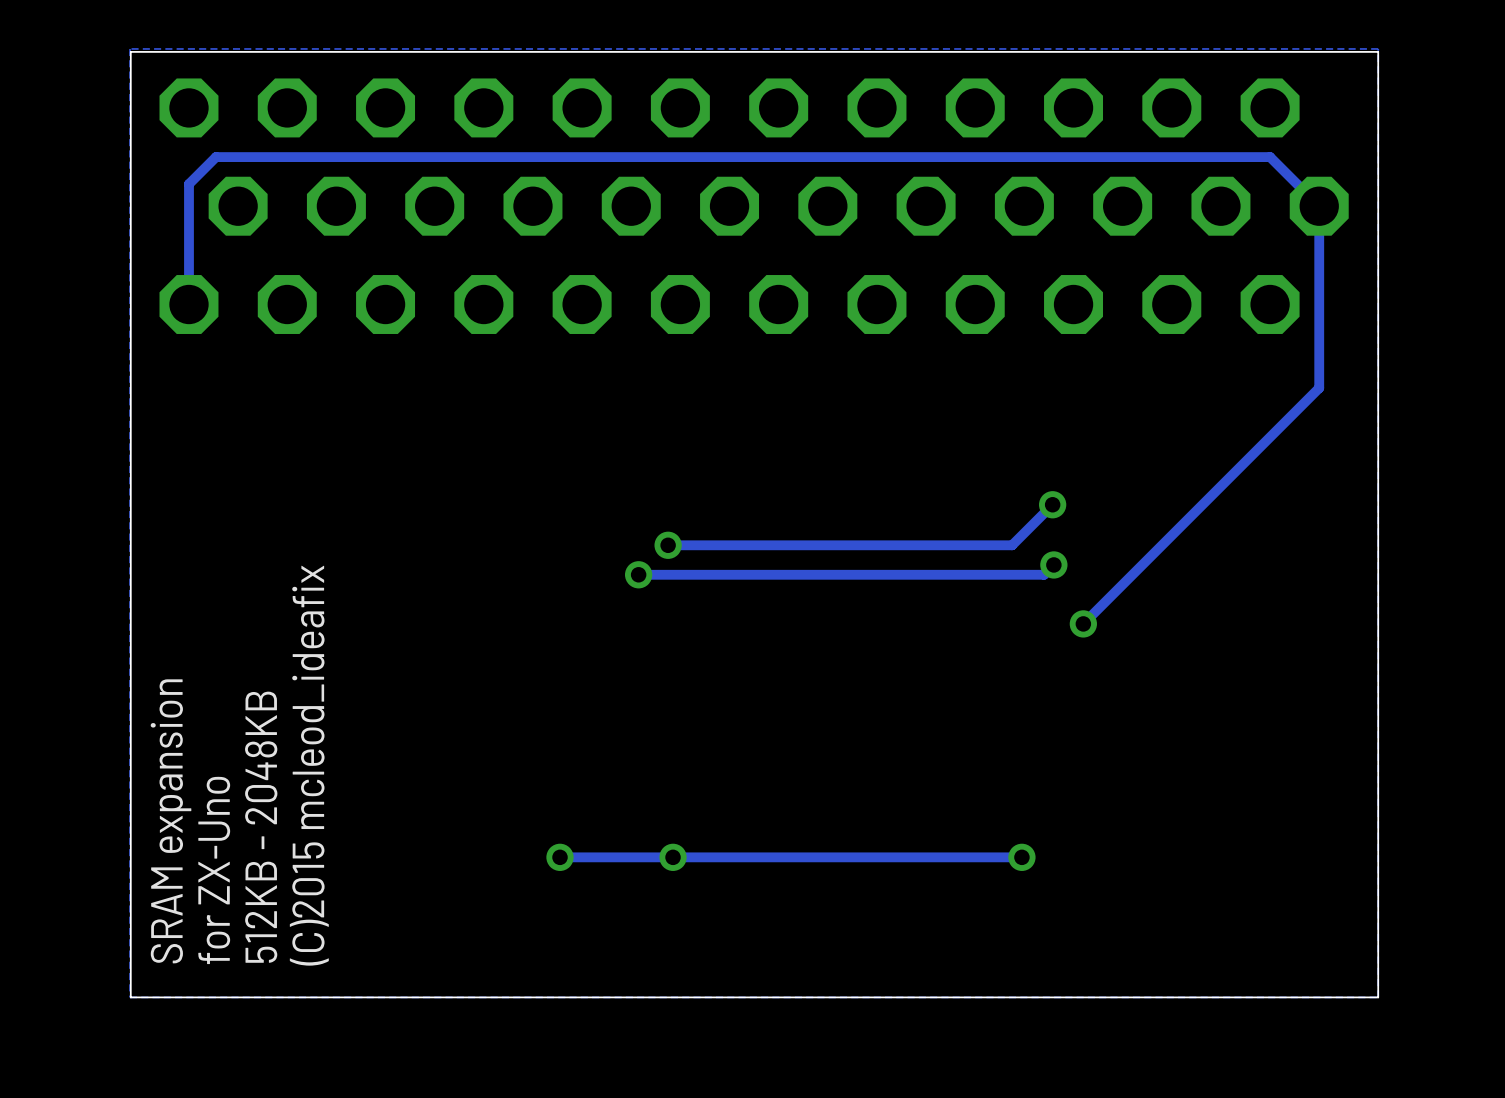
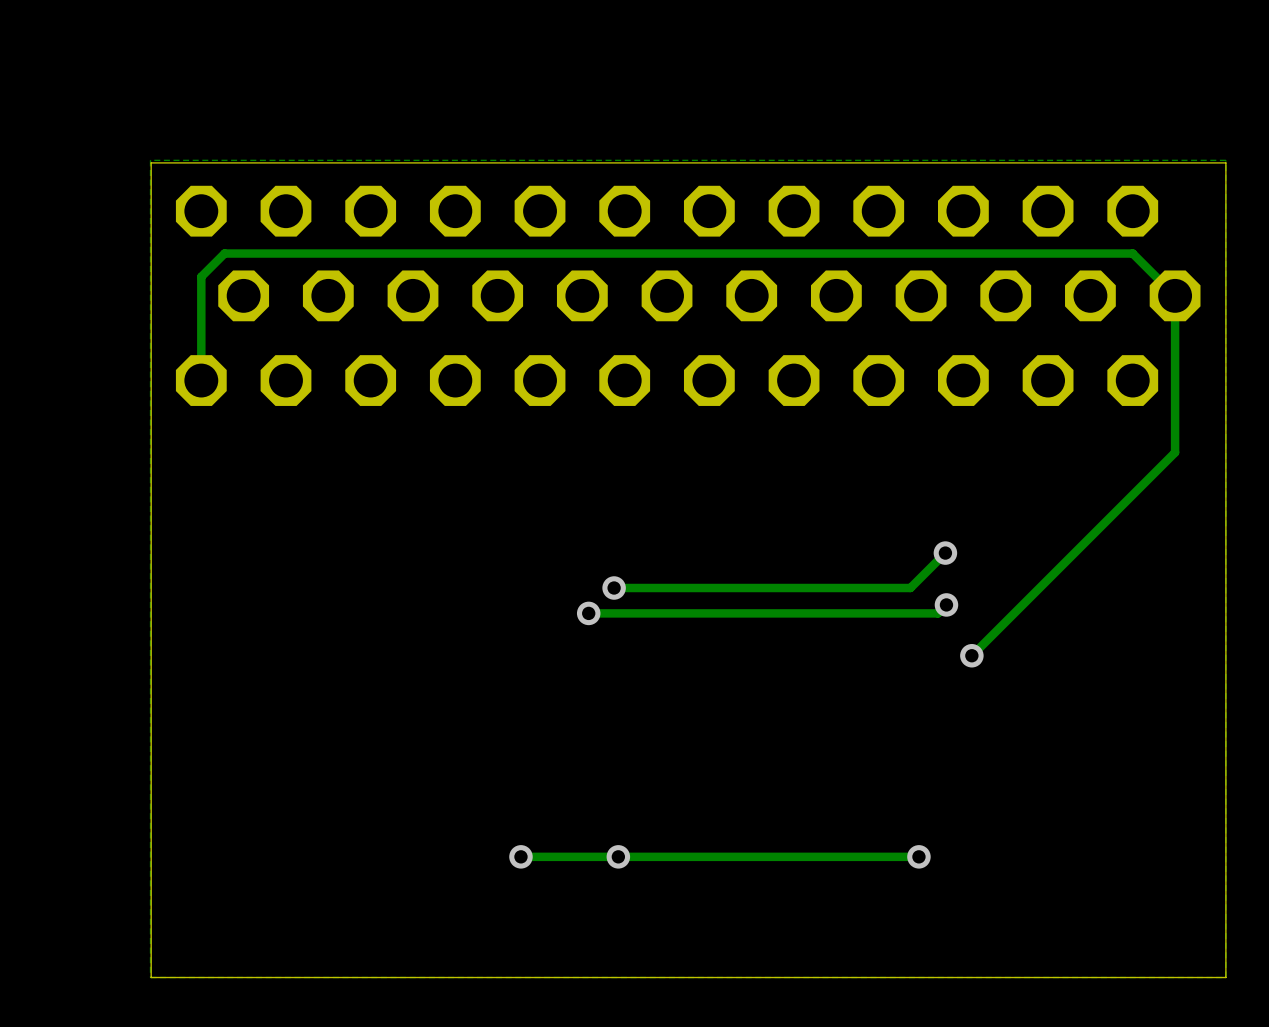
text: (C)2015 mcleod_ideafix (309, 765) -> none
text: SRAM expansion (171, 821) -> none
text: 512KB - 2048KB (261, 827) -> none
text: for ZX-Uno (214, 870) -> none

